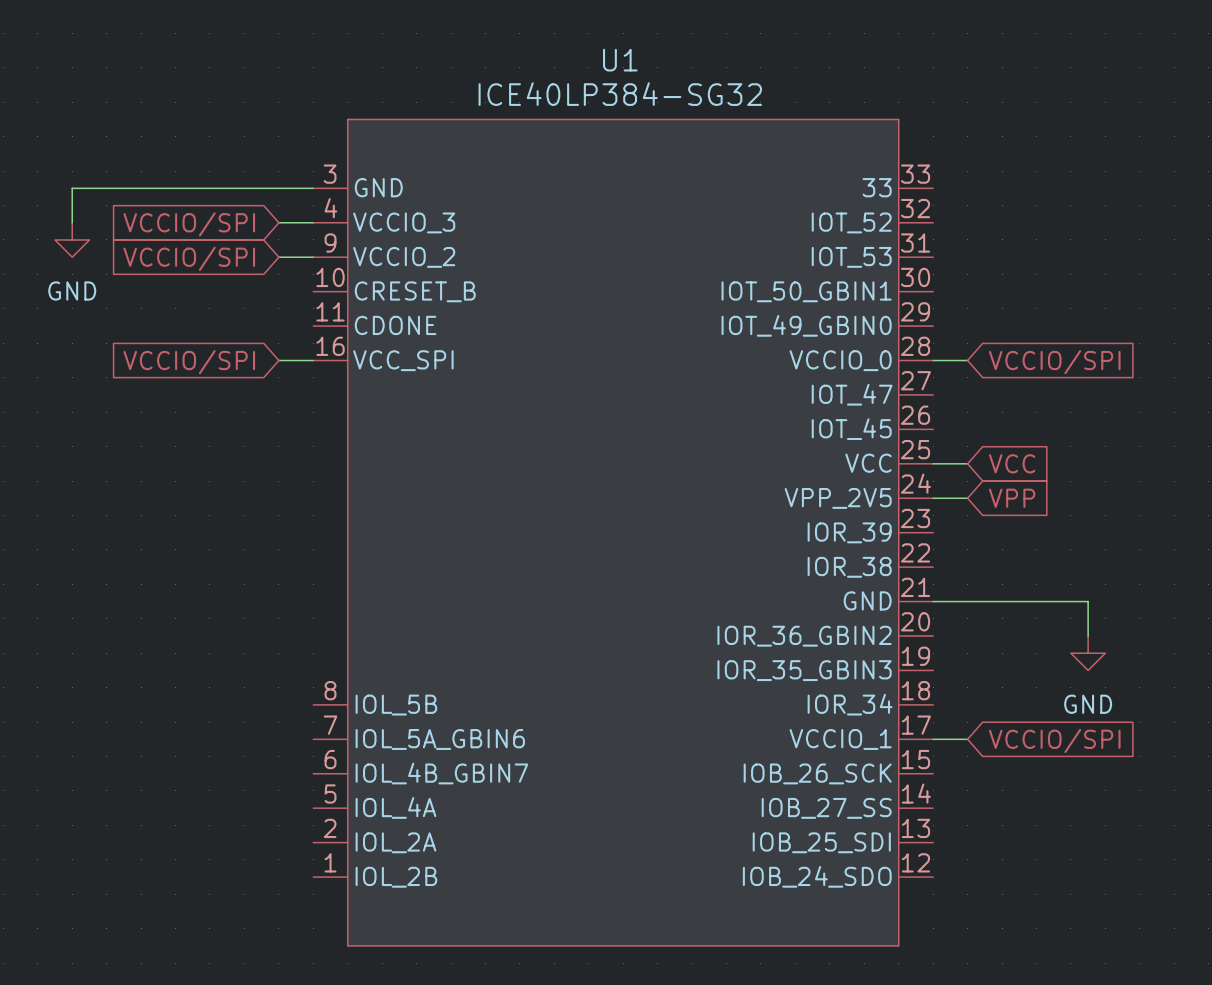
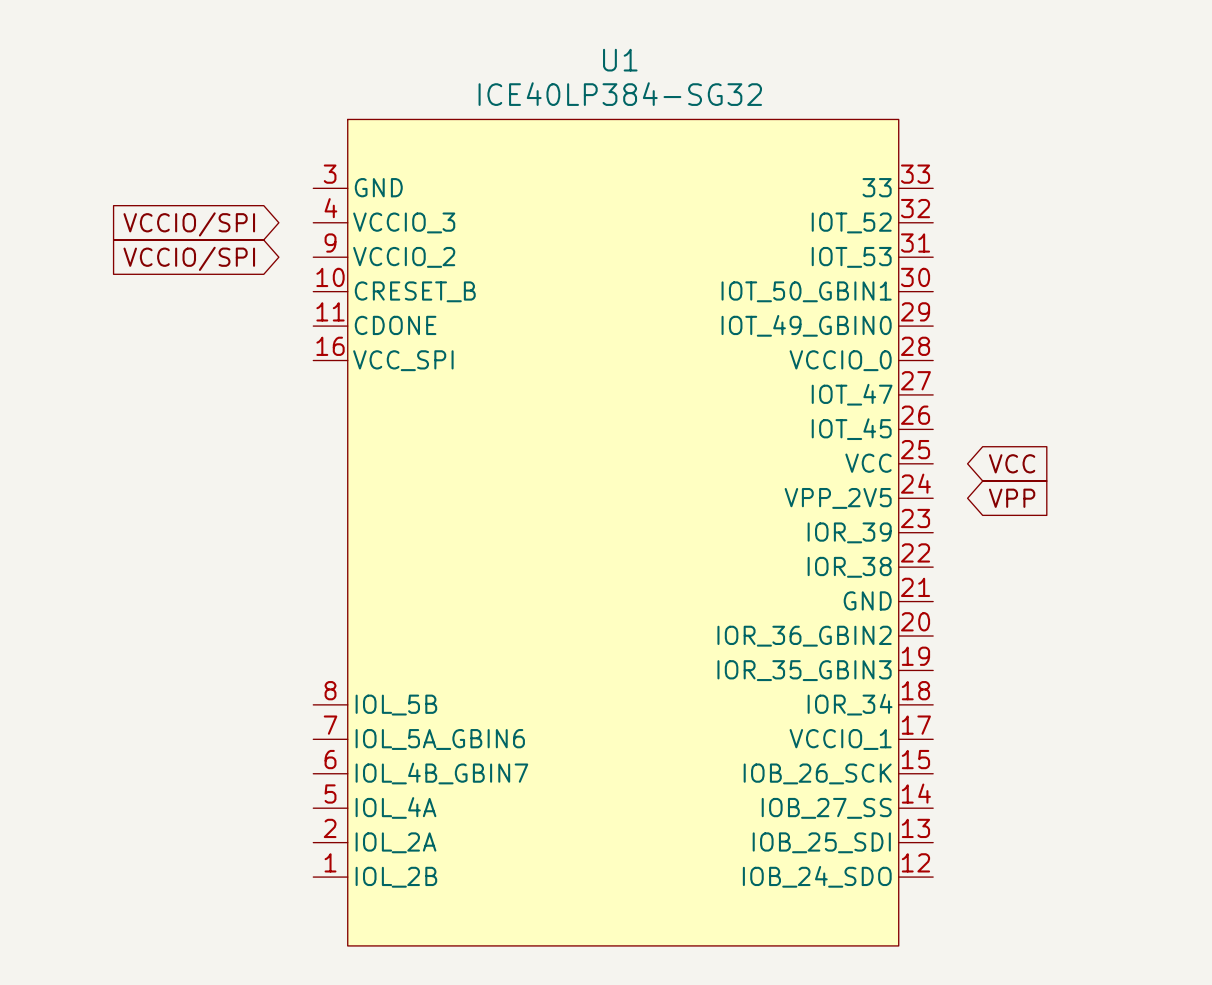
wire: (313, 188) (72, 188) (72, 222) -> none
wire: (278, 222) (313, 222) -> none
power symbol: GND (72, 239) -> none
wire: (278, 257) (313, 257) -> none
wire: (278, 360) (313, 360) -> none
wire: (933, 360) (967, 360) -> none
global label: VCCIO/SPI (189, 362) -> none
global label: VCCIO/SPI (1054, 362) -> none
wire: (933, 463) (967, 463) -> none
wire: (933, 498) (967, 498) -> none
wire: (933, 601) (1088, 601) (1088, 636) -> none
power symbol: GND (1088, 653) -> none
wire: (933, 739) (967, 739) -> none
global label: VCCIO/SPI (1054, 740) -> none

